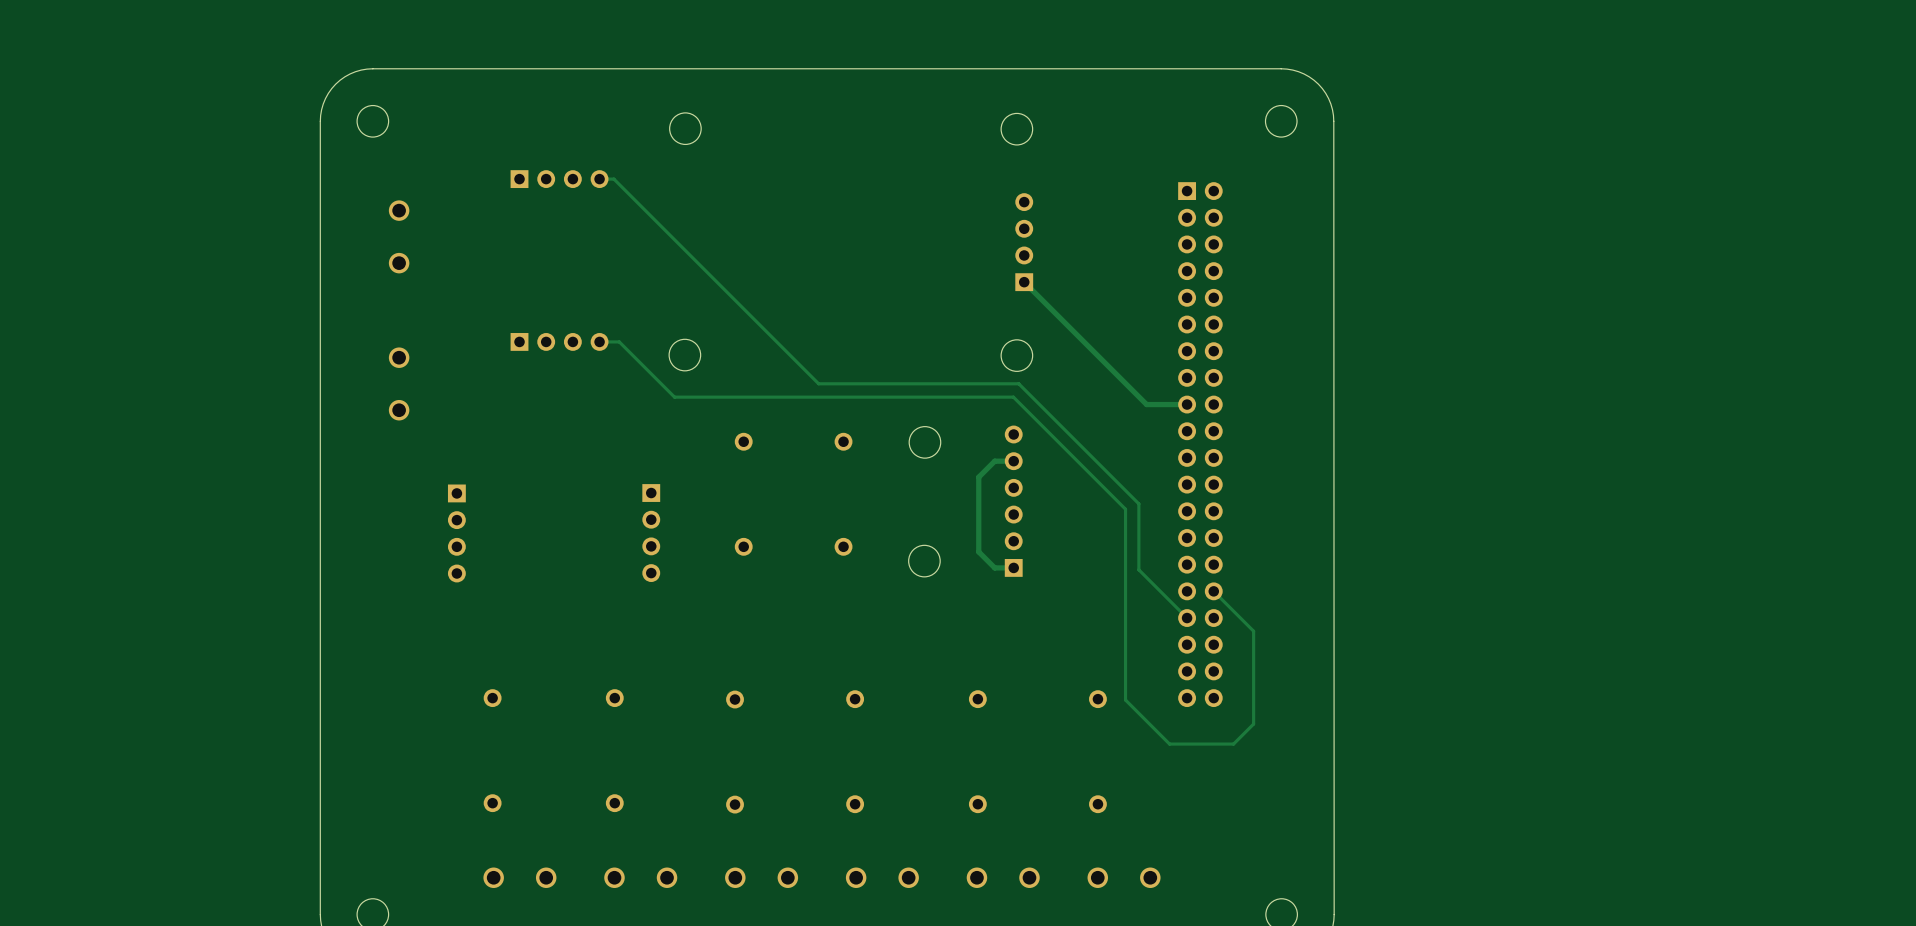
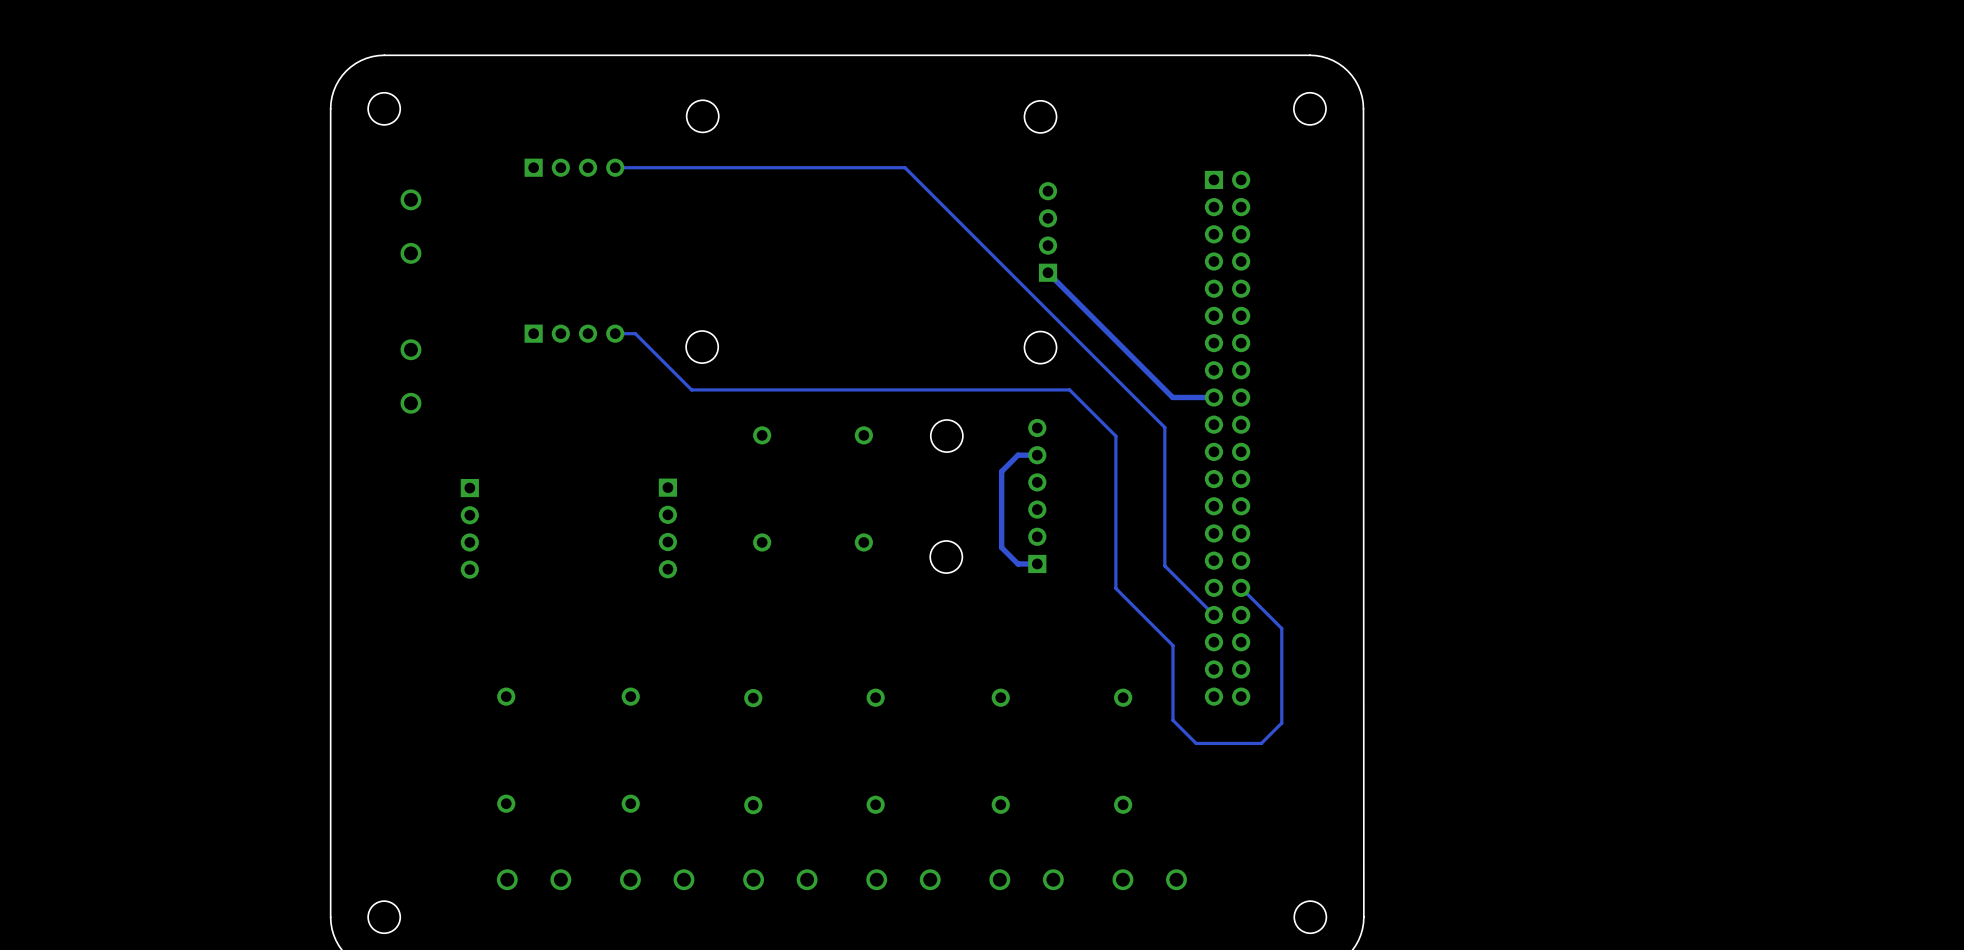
track: (613, 179) (818, 383) (1018, 383) (1138, 503) -> (629, 167) (905, 167) (1164, 427) (1164, 498)
track: (1013, 397) (1125, 509) (1125, 700) (1146, 721) -> (1037, 389) (1069, 389) (1115, 436) (1115, 588) (1173, 645) (1173, 720)

